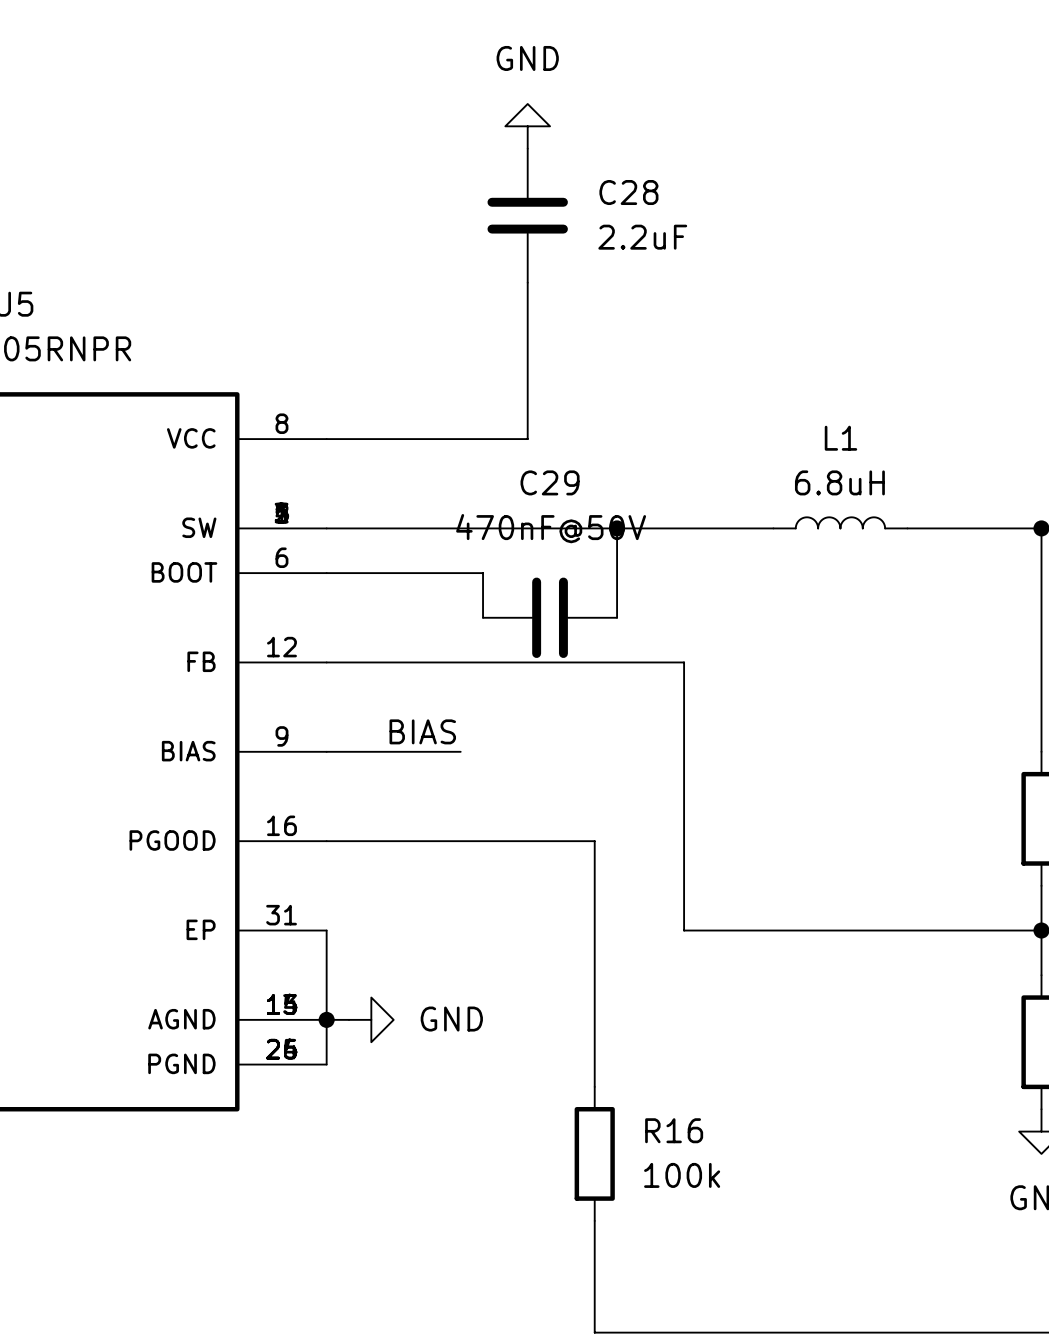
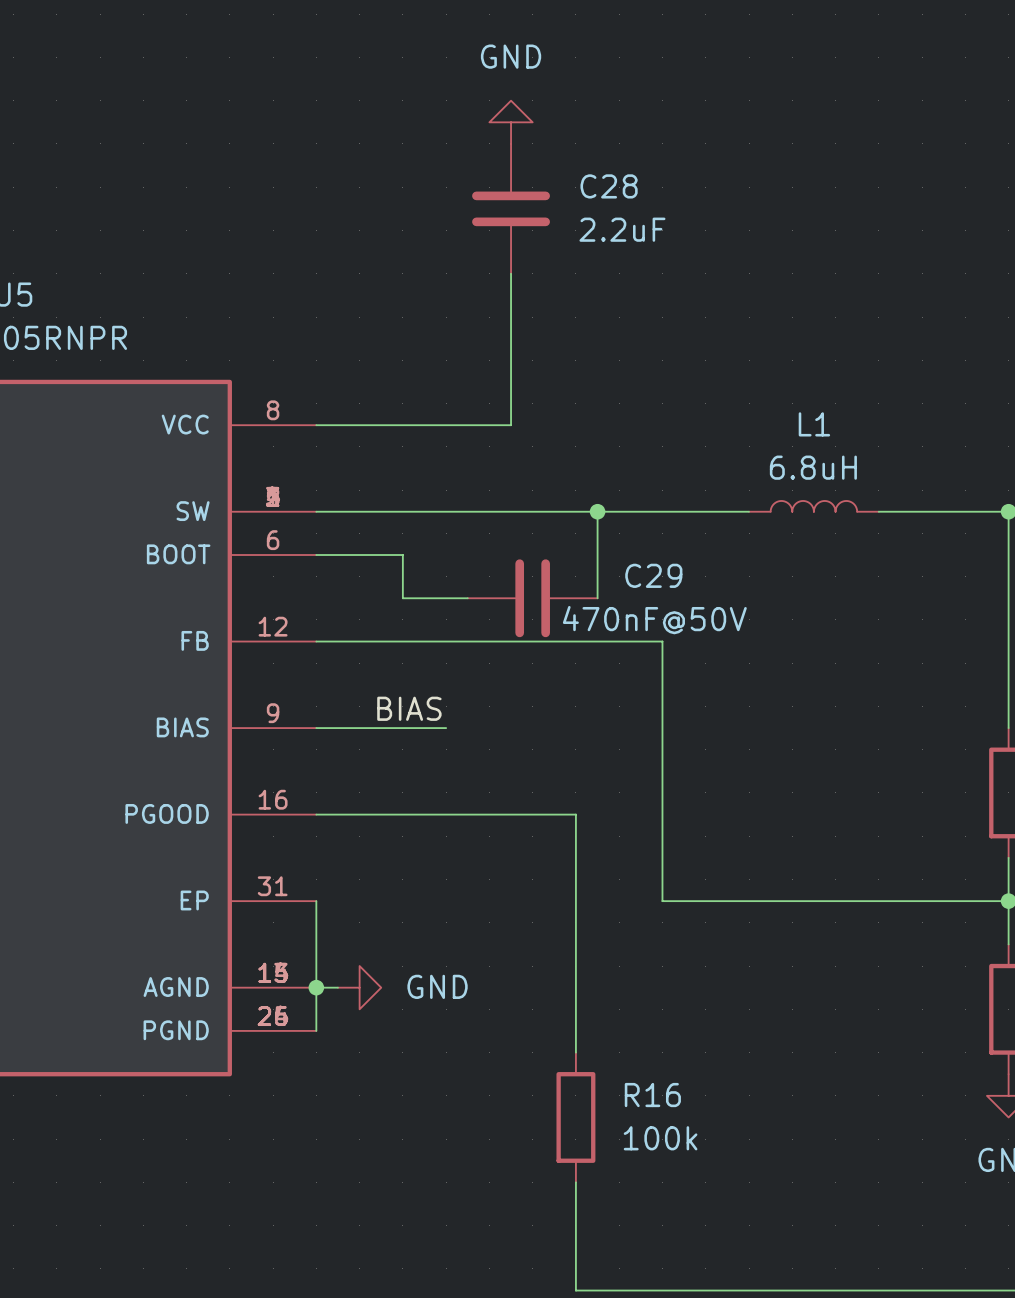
C29 name position: C29 (550, 482) -> C29 (653, 575)
C29 value position: 470nF@50V (551, 528) -> 470nF@50V (654, 620)
wire: (416, 573) (483, 573) (483, 617) -> (402, 555) (402, 598) (467, 598)

